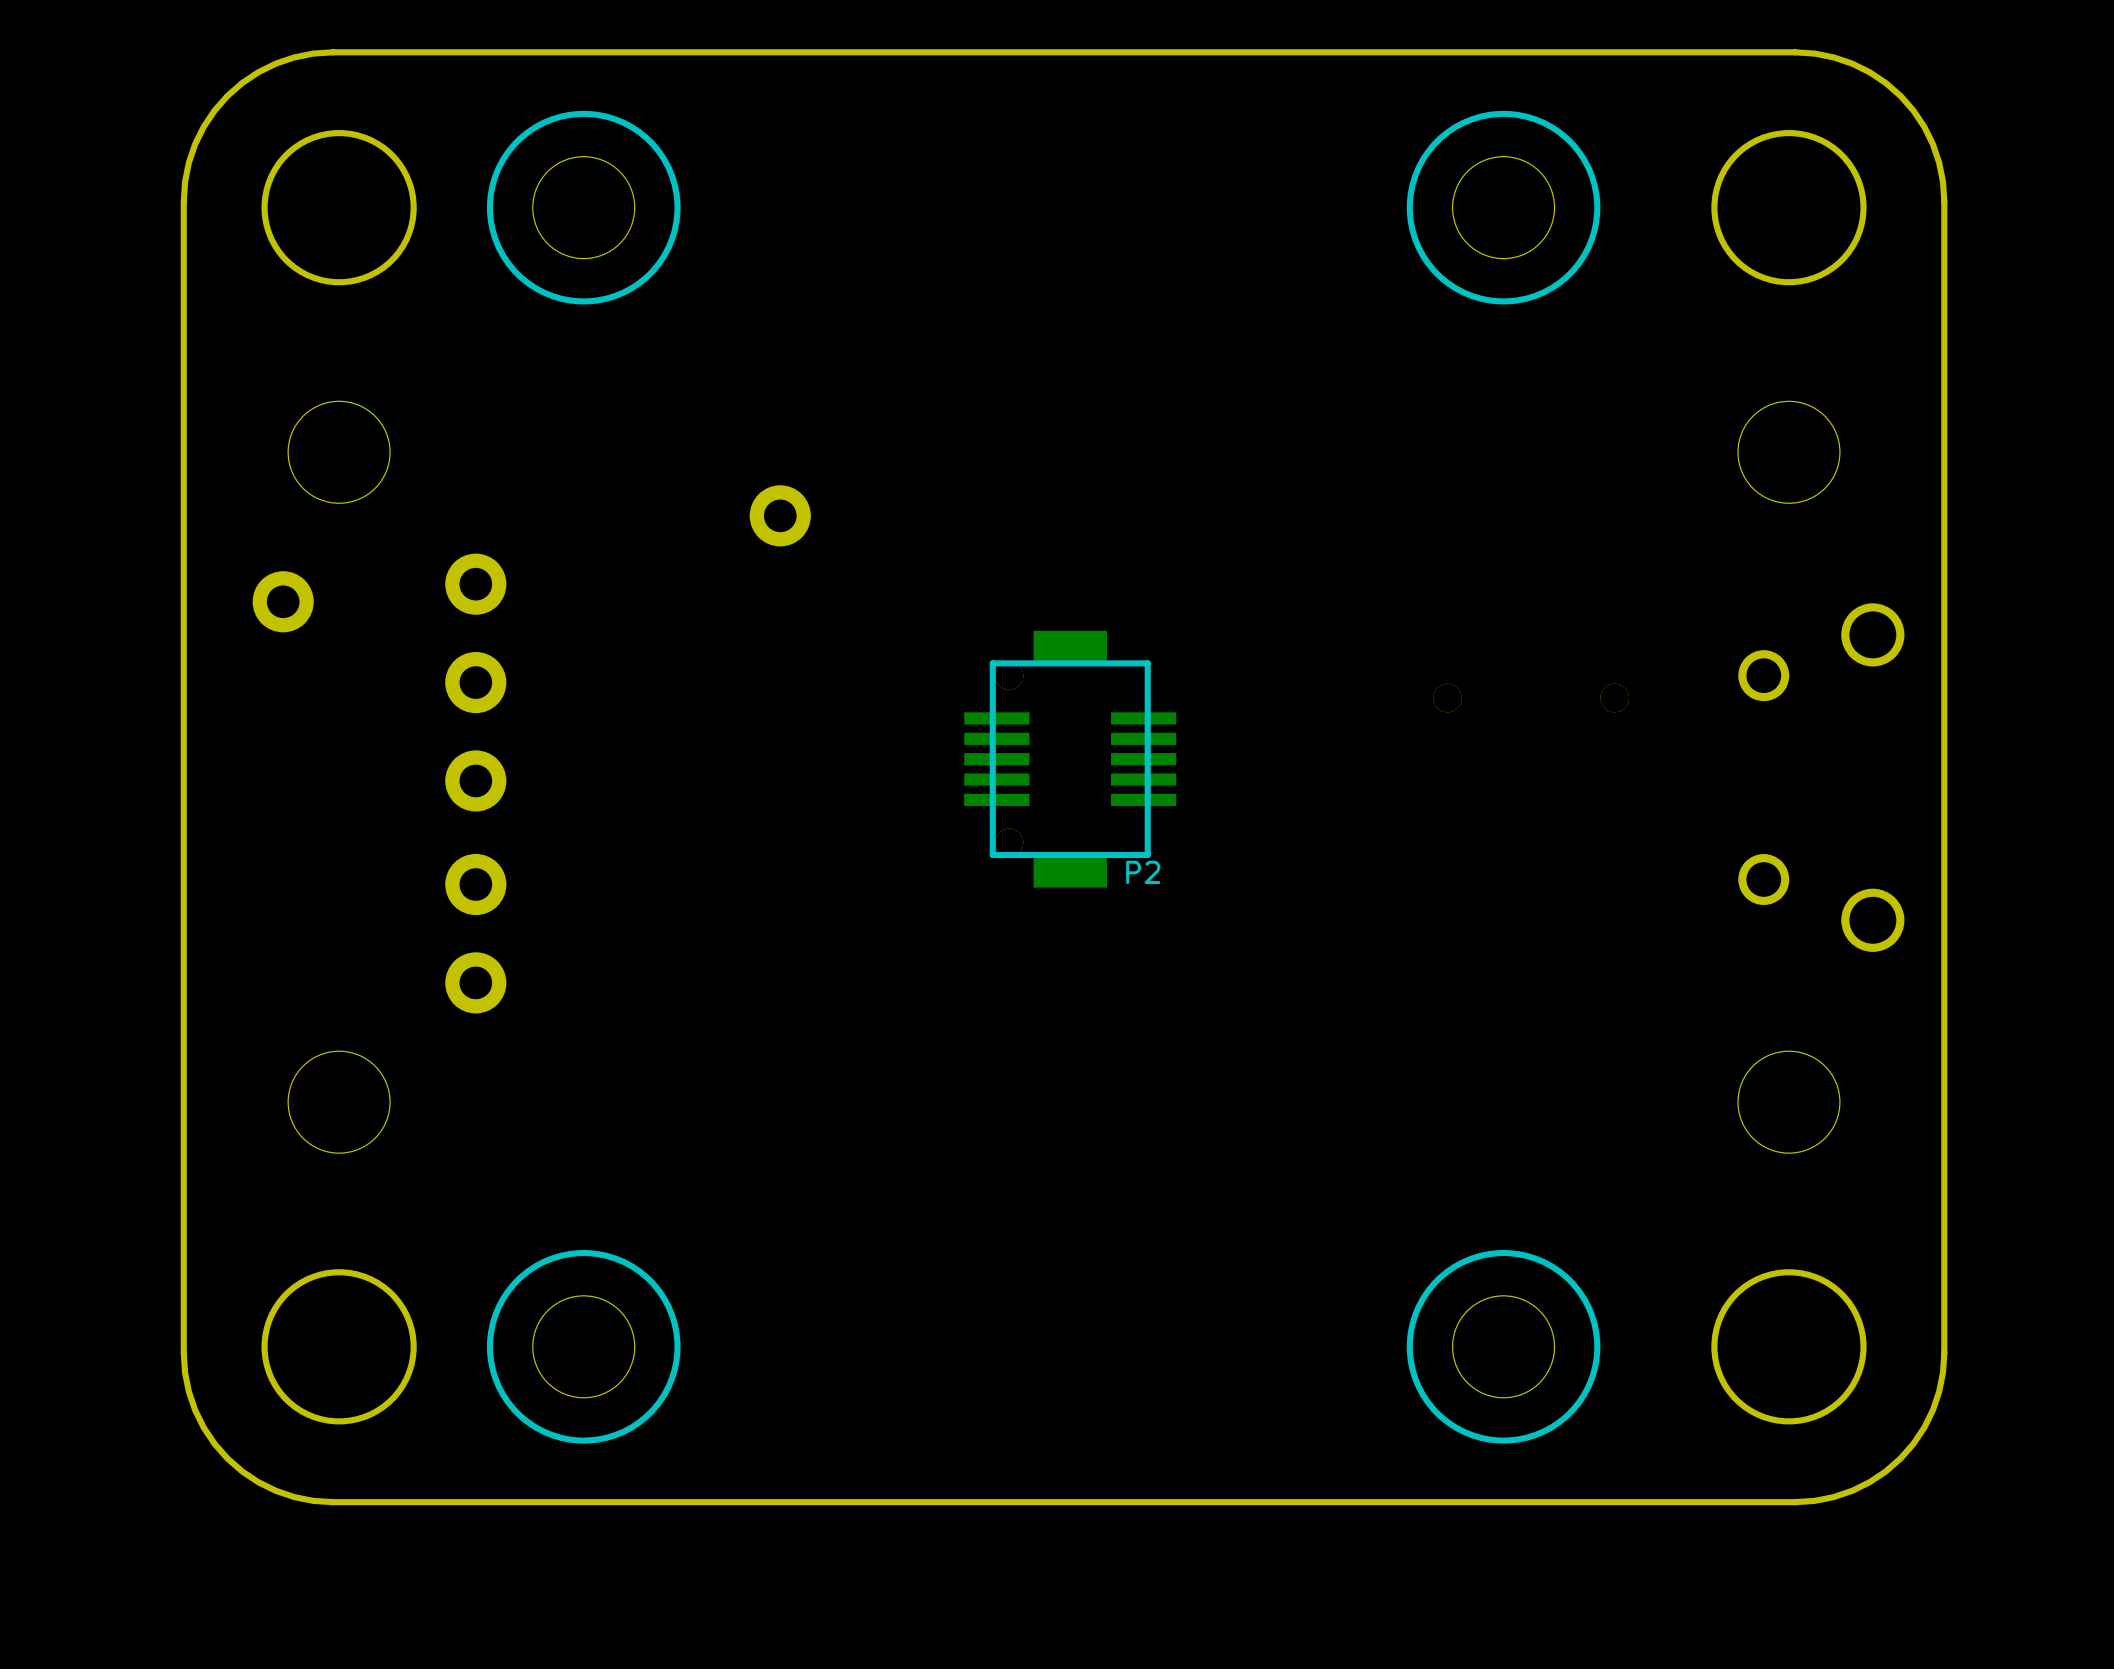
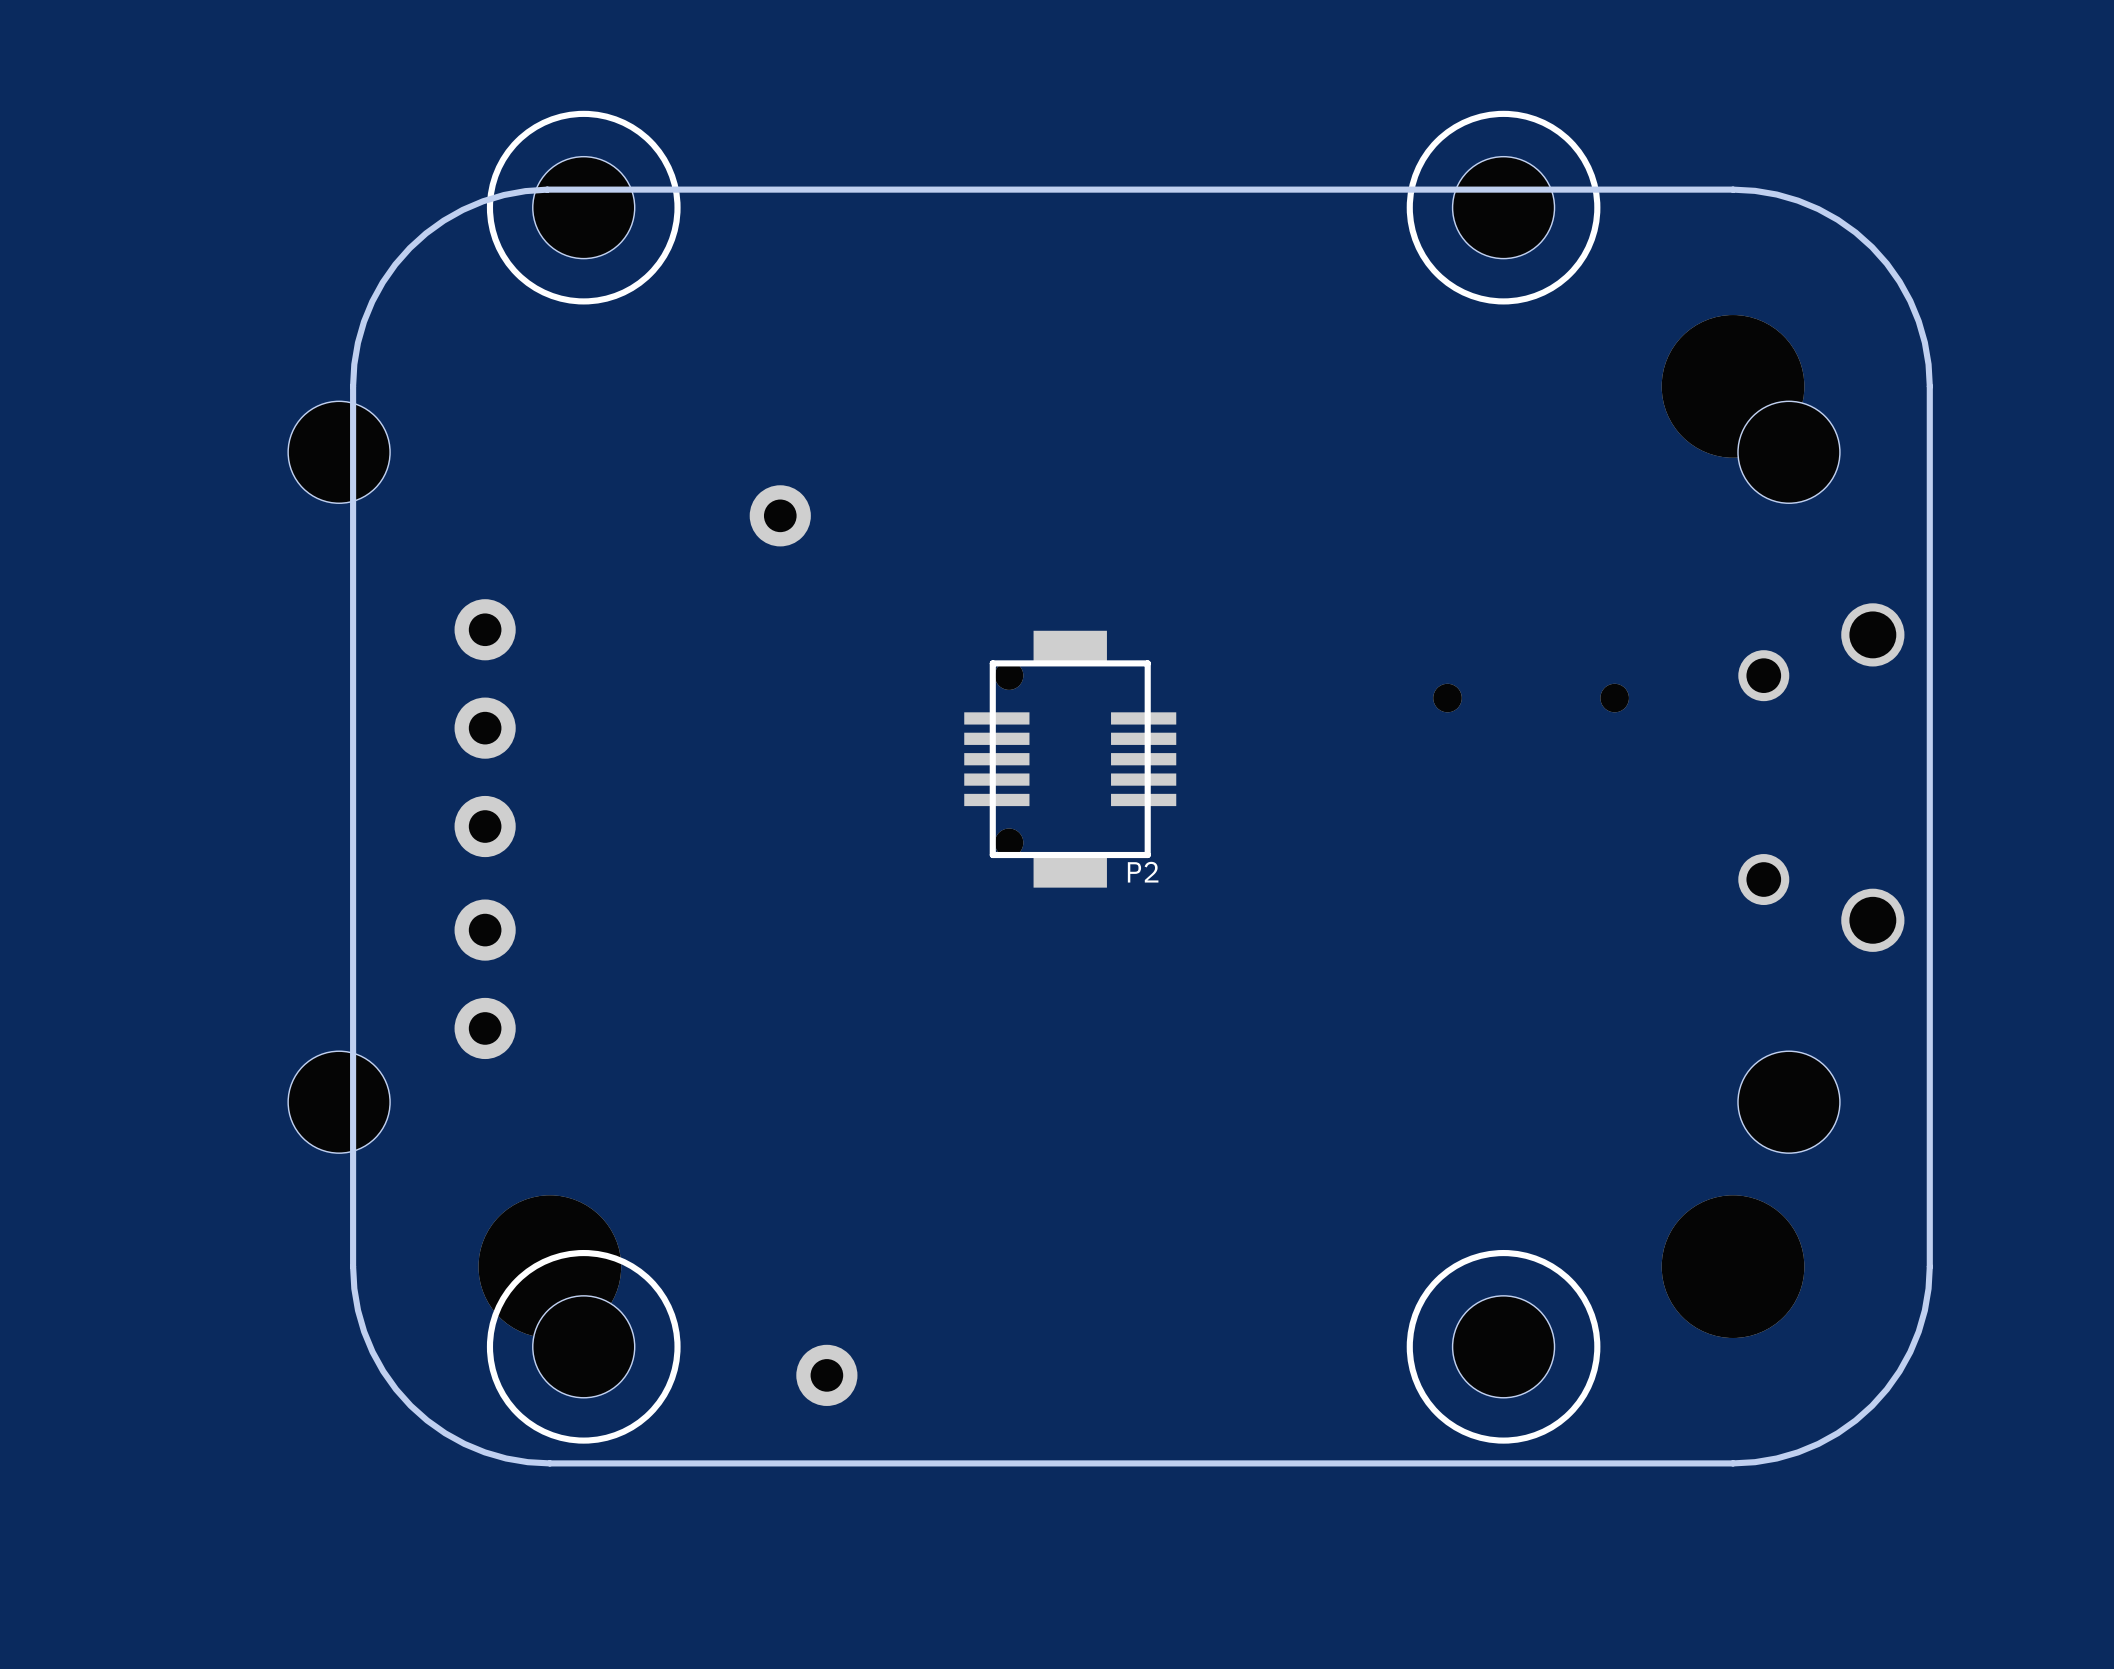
round board edge: [261, 130, 417, 286] -> none
round board edge: [1711, 130, 1867, 286] -> none
part: none -> (1733, 386)
part: (475, 584) -> none
part: (283, 601) -> none
part: none -> (485, 629)
part: (475, 682) -> none
part: none -> (485, 728)
part: (475, 780) -> none
part: none -> (485, 826)
part: (475, 884) -> none
part: none -> (485, 930)
part: (475, 982) -> none
part: none -> (485, 1028)
part: none -> (549, 1266)
part: none -> (1733, 1266)
round board edge: [261, 1269, 417, 1425] -> none
round board edge: [1711, 1269, 1867, 1425] -> none
board edge: (183, 1353) (183, 201) (185, 181) (195, 144) (214, 110) (242, 83) (258, 72) (294, 57) (332, 52) (1795, 52) (1833, 57) (1869, 72) (1885, 83) (1913, 110) (1924, 126) (1939, 162) (1944, 201) (1944, 1353) (1939, 1391) (1924, 1427) (1913, 1443) (1885, 1471) (1869, 1482) (1833, 1497) (1795, 1502) (313, 1500) (294, 1497) (258, 1482) (227, 1458) (203, 1427) (195, 1410) (188, 1391) (183, 1353) -> (1733, 189) (1776, 194) (1818, 209) (1855, 232) (1872, 247) (1886, 263) (1910, 301) (1924, 342) (1928, 364) (1929, 1266) (1924, 1310) (1910, 1352) (1899, 1371) (1872, 1405) (1837, 1433) (1818, 1443) (1776, 1458) (1733, 1463) (549, 1463) (506, 1458) (464, 1443) (445, 1433) (410, 1405) (396, 1389) (372, 1352) (358, 1310) (353, 1266) (353, 386) (357, 342) (372, 301) (395, 264) (409, 248) (443, 220) (482, 201) (503, 195) (547, 189) (1733, 189)
part: none -> (826, 1375)

